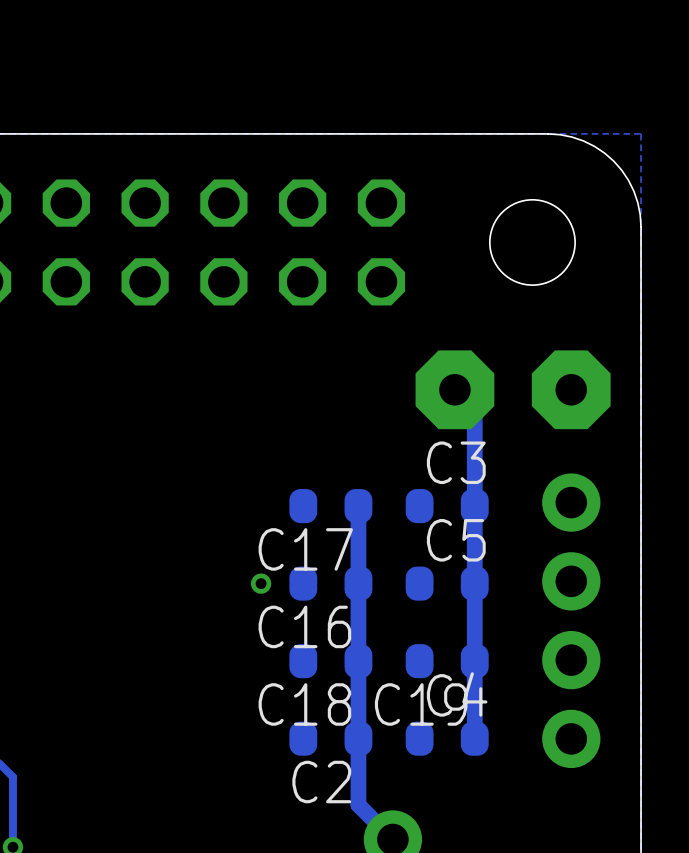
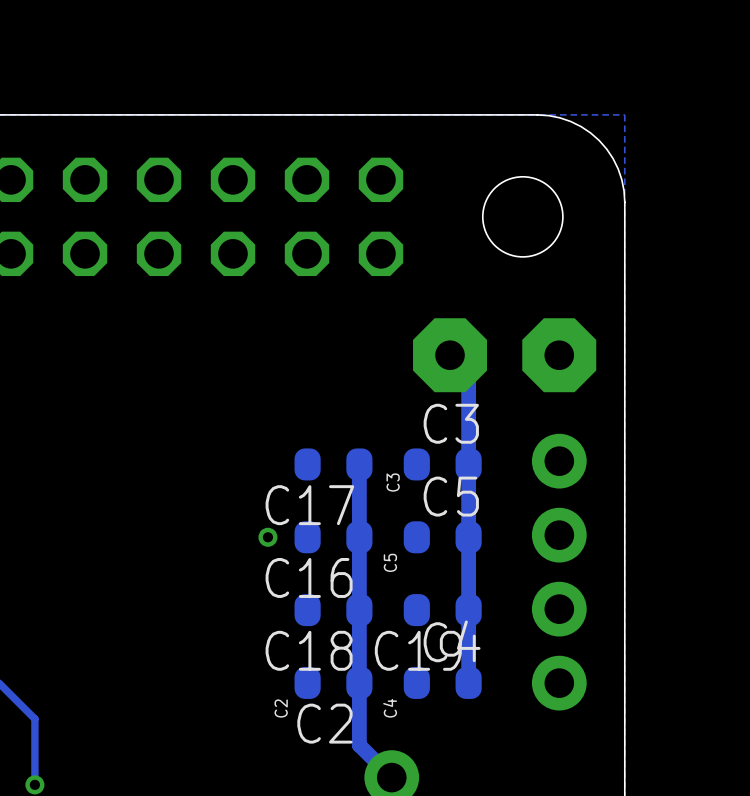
text: none -> C3 (393, 482)
text: none -> C5 (390, 562)
text: none -> C2 (281, 708)
text: none -> C4 (390, 708)

